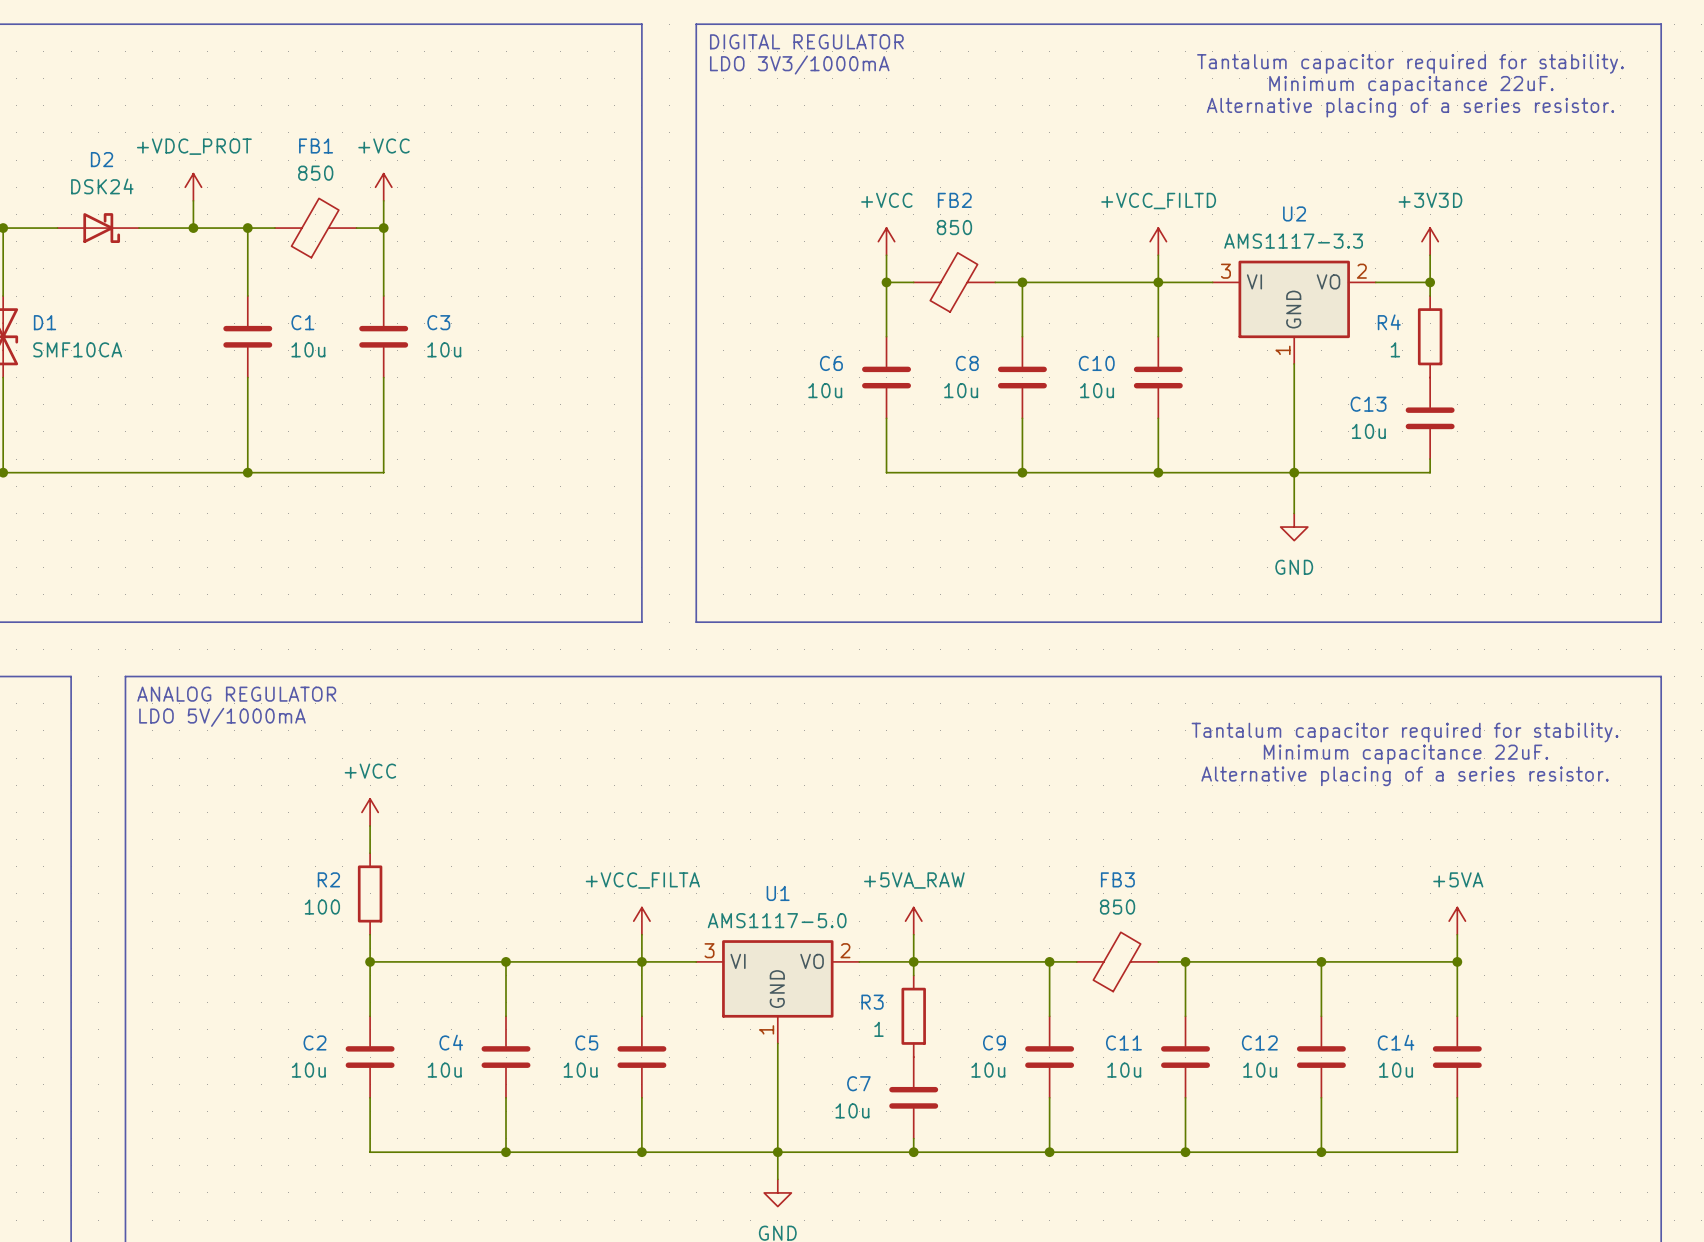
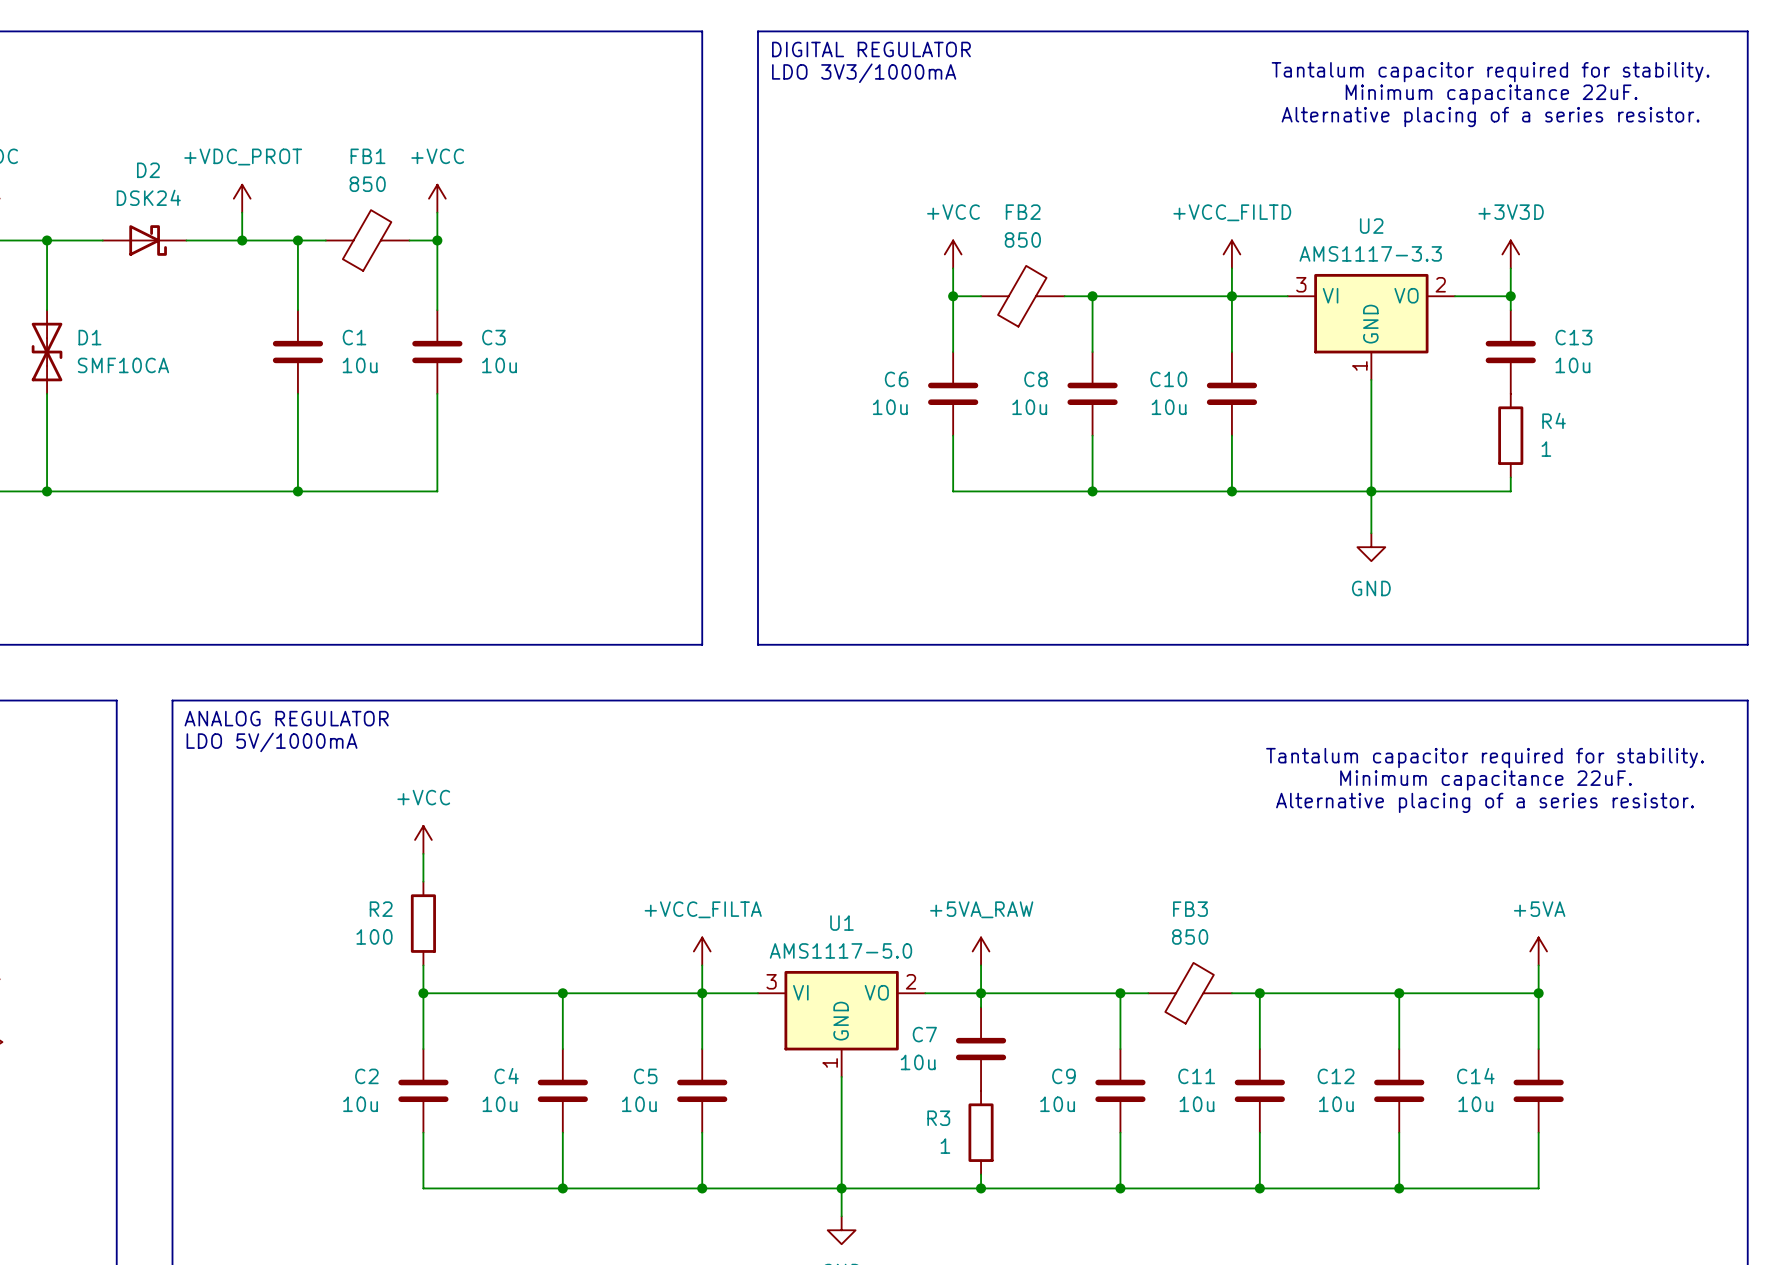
R4 name position: R4 (1389, 322) -> R4 (1554, 420)
R4 position: (1430, 336) -> (1510, 435)
R4 value position: 1 (1395, 349) -> 1 (1546, 449)
C13 name position: C13 (1368, 404) -> C13 (1573, 337)
C13 position: (1430, 418) -> (1510, 352)
C13 value position: 10u (1368, 431) -> 10u (1572, 365)
R3 position: (913, 1016) -> (981, 1132)
C7 position: (913, 1097) -> (981, 1049)

